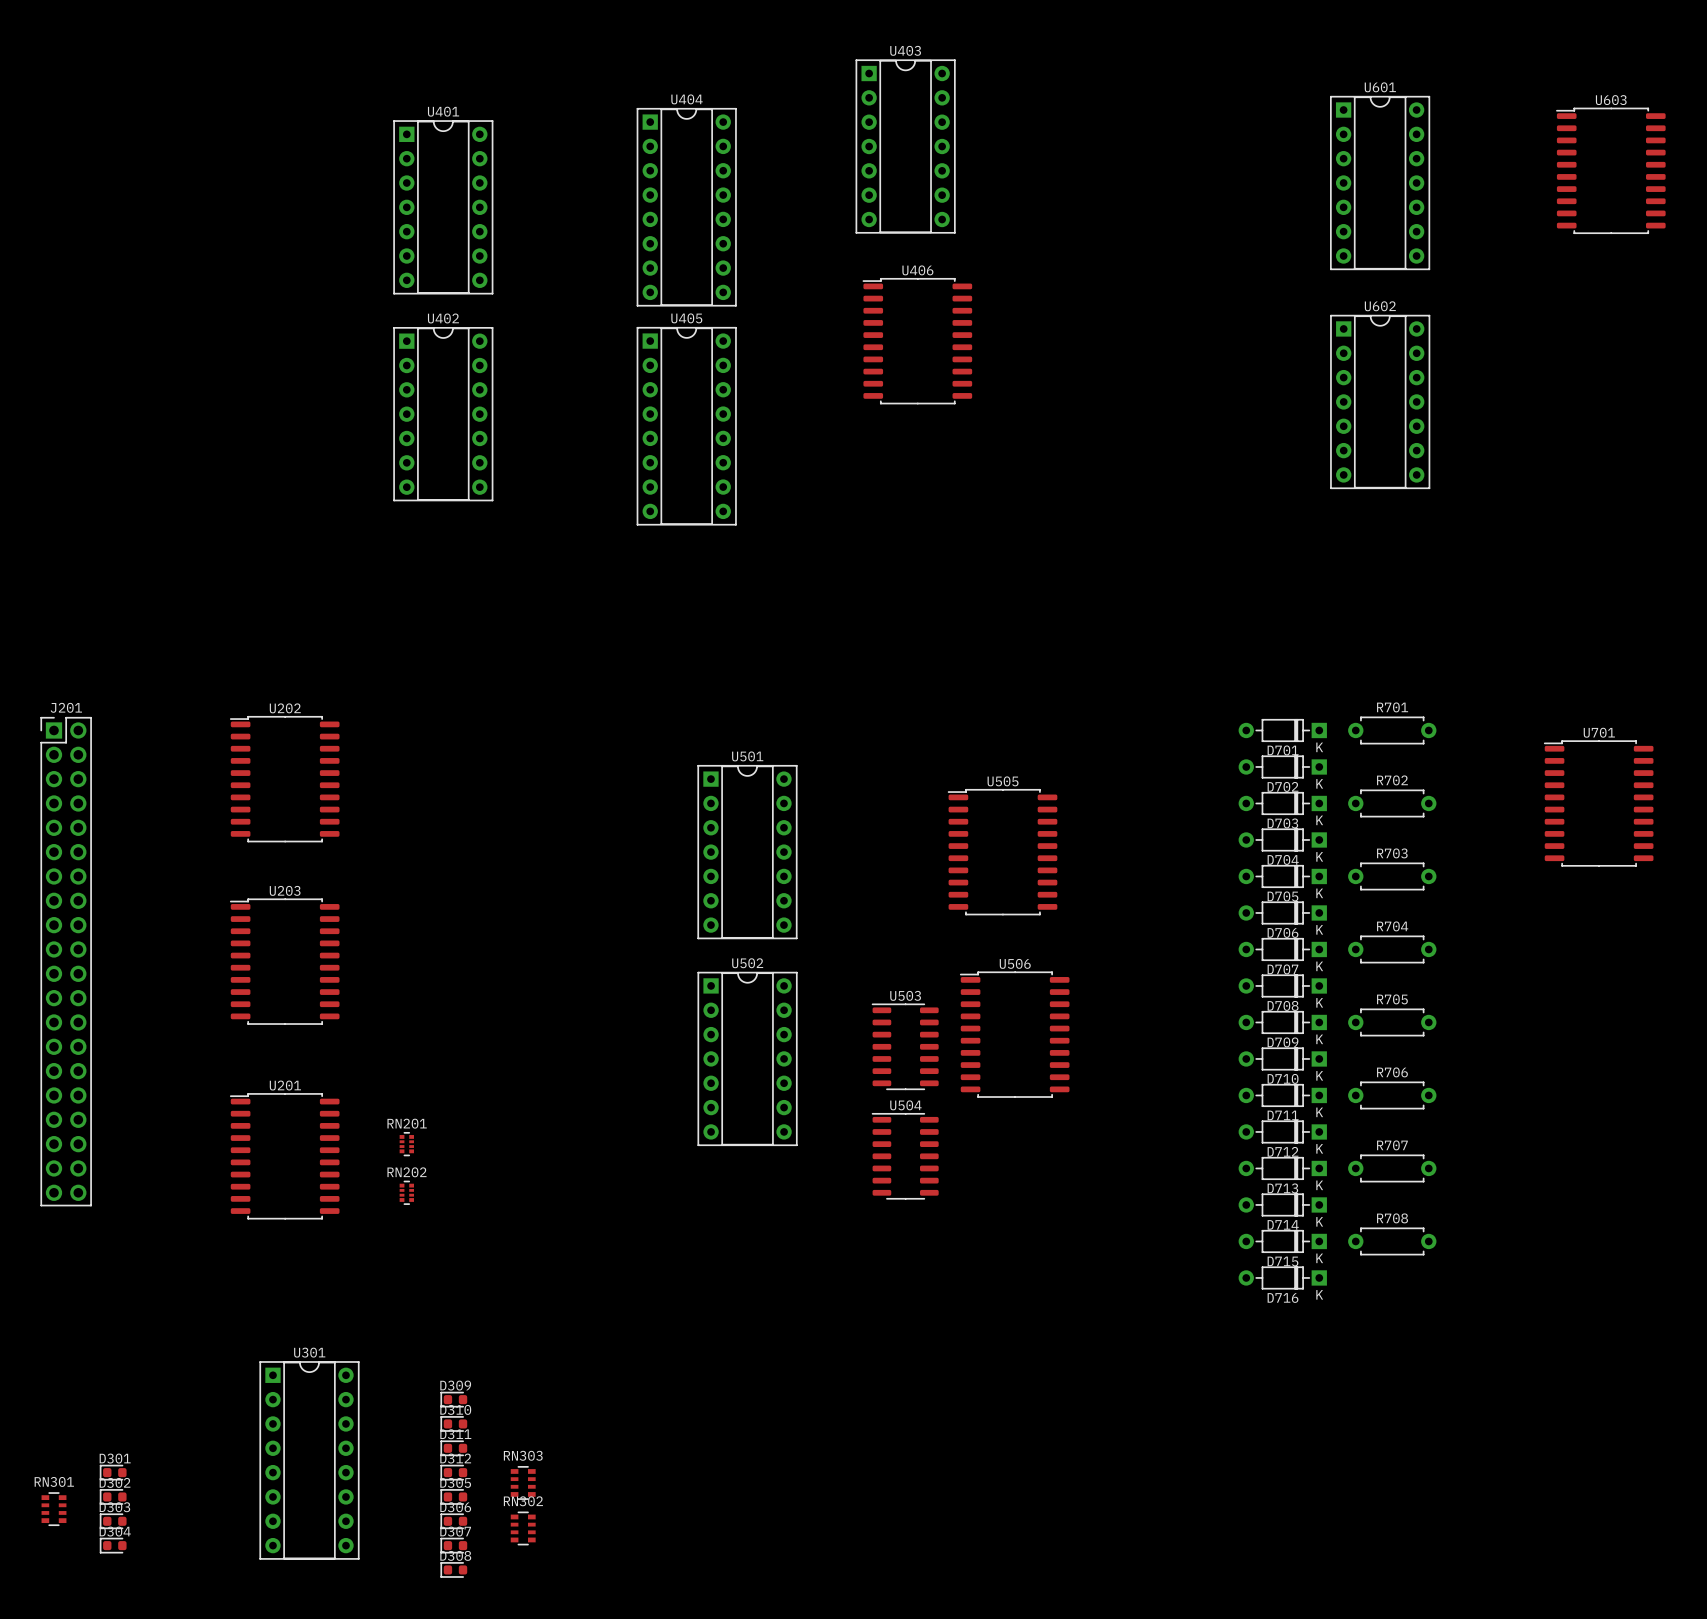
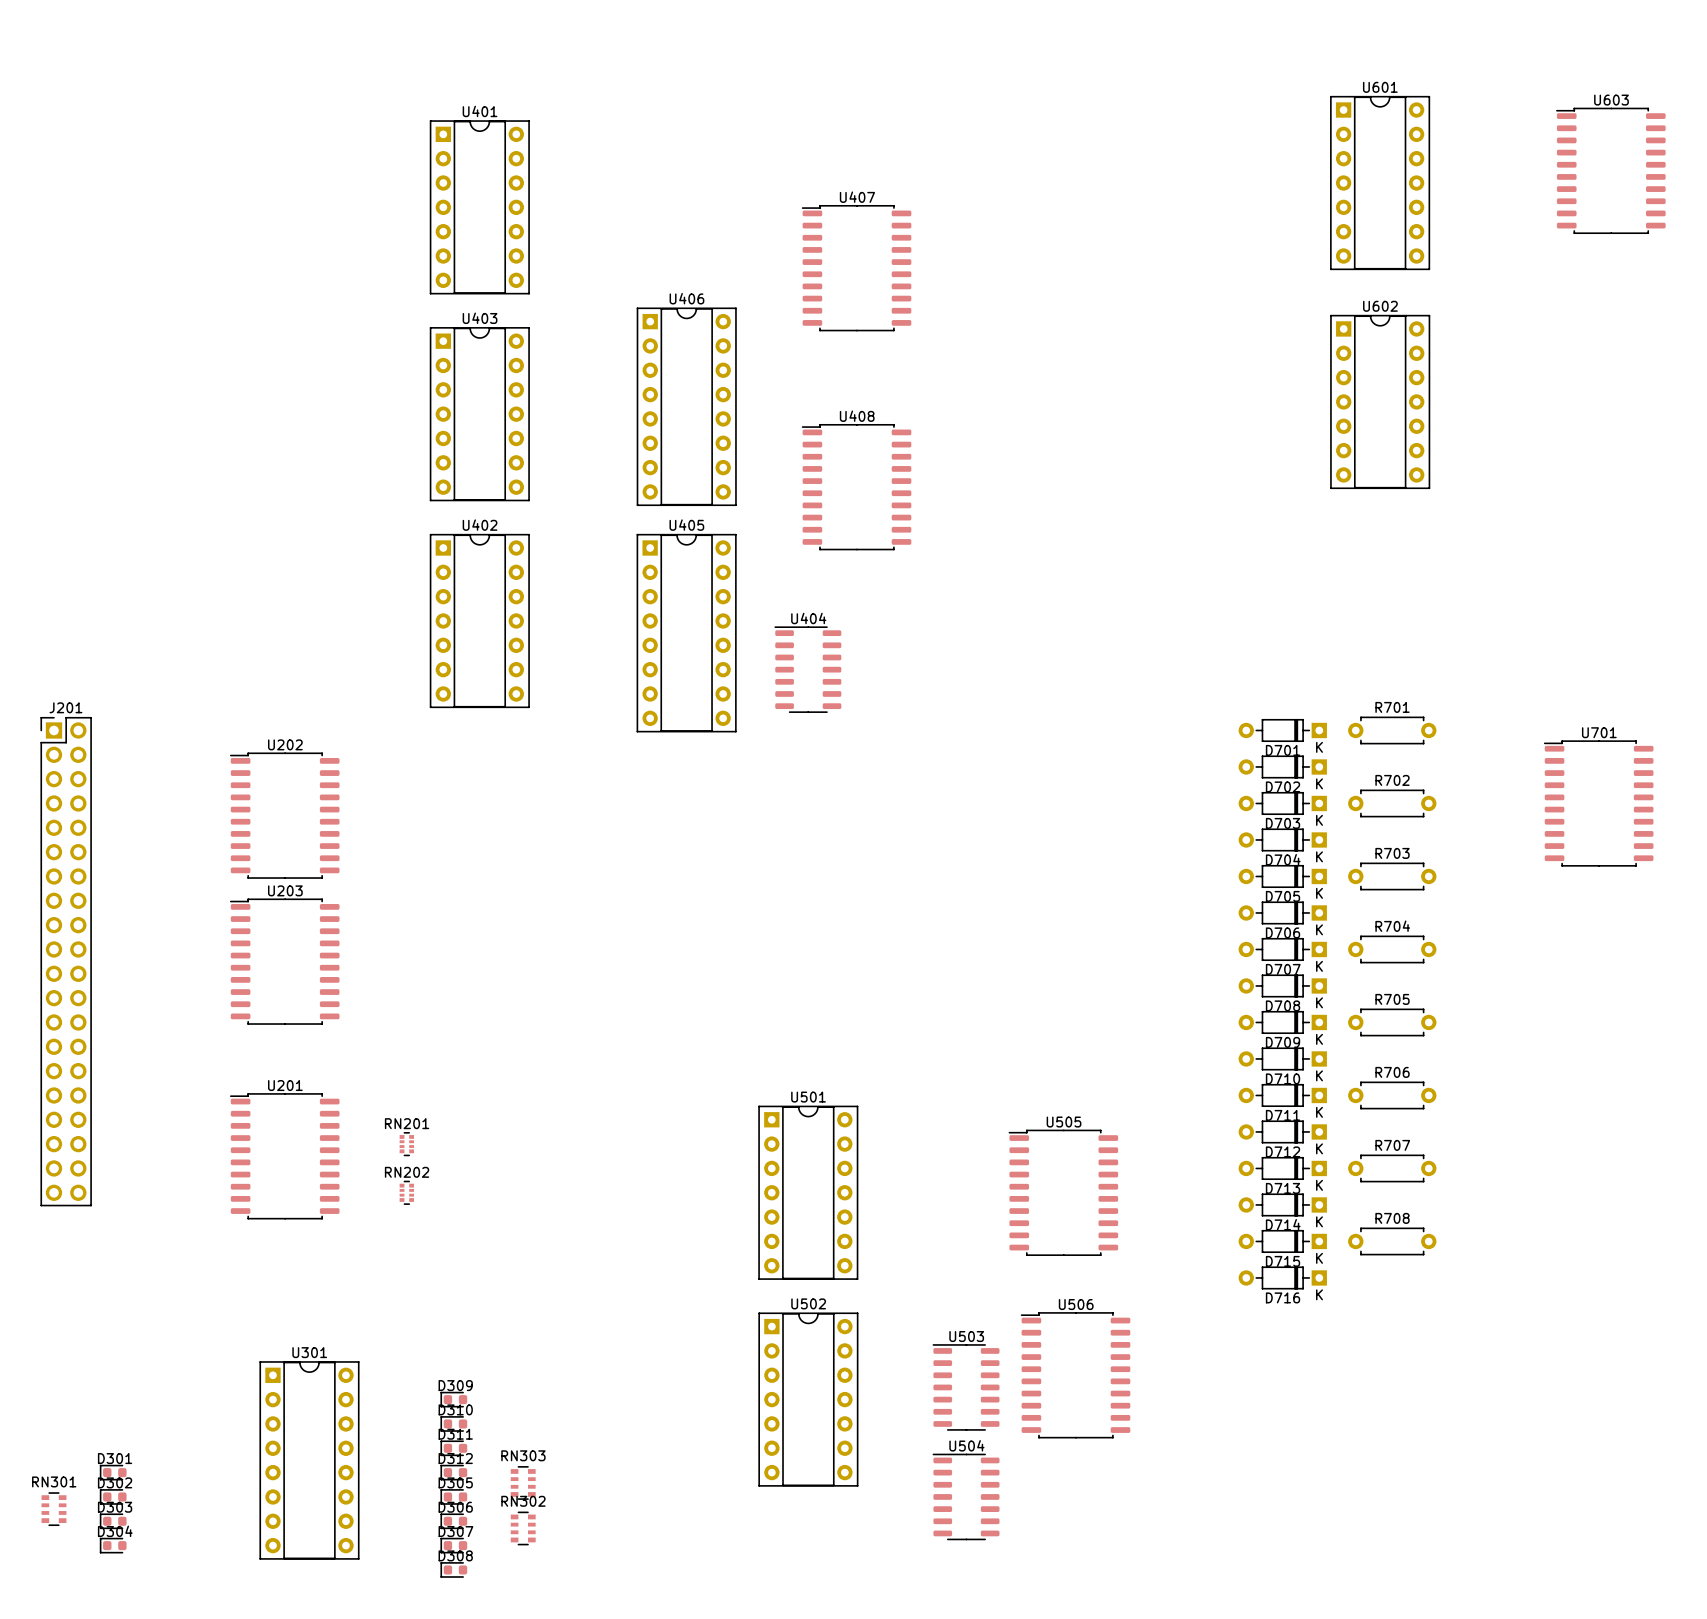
U404 name position: U404 (687, 99) -> U404 (808, 618)
U404 footprint: [636, 108, 737, 307] -> [774, 626, 842, 713]
U403 position: (905, 146) -> (479, 414)
U401 position: (443, 207) -> (479, 207)
U407: none -> (856, 268)
U406 name position: U406 (917, 270) -> U406 (686, 298)
U406 footprint: [862, 278, 973, 405] -> [636, 307, 737, 506]
U402 position: (443, 414) -> (479, 620)
U405 position: (686, 426) -> (686, 633)
U408: none -> (856, 487)
U202 position: (284, 779) -> (284, 815)
U501 position: (747, 852) -> (808, 1192)
U505 position: (1002, 852) -> (1063, 1192)
U506 position: (1014, 1034) -> (1075, 1375)
U503 position: (905, 1046) -> (966, 1387)
U502 position: (747, 1058) -> (808, 1399)
U504 position: (905, 1156) -> (966, 1496)

